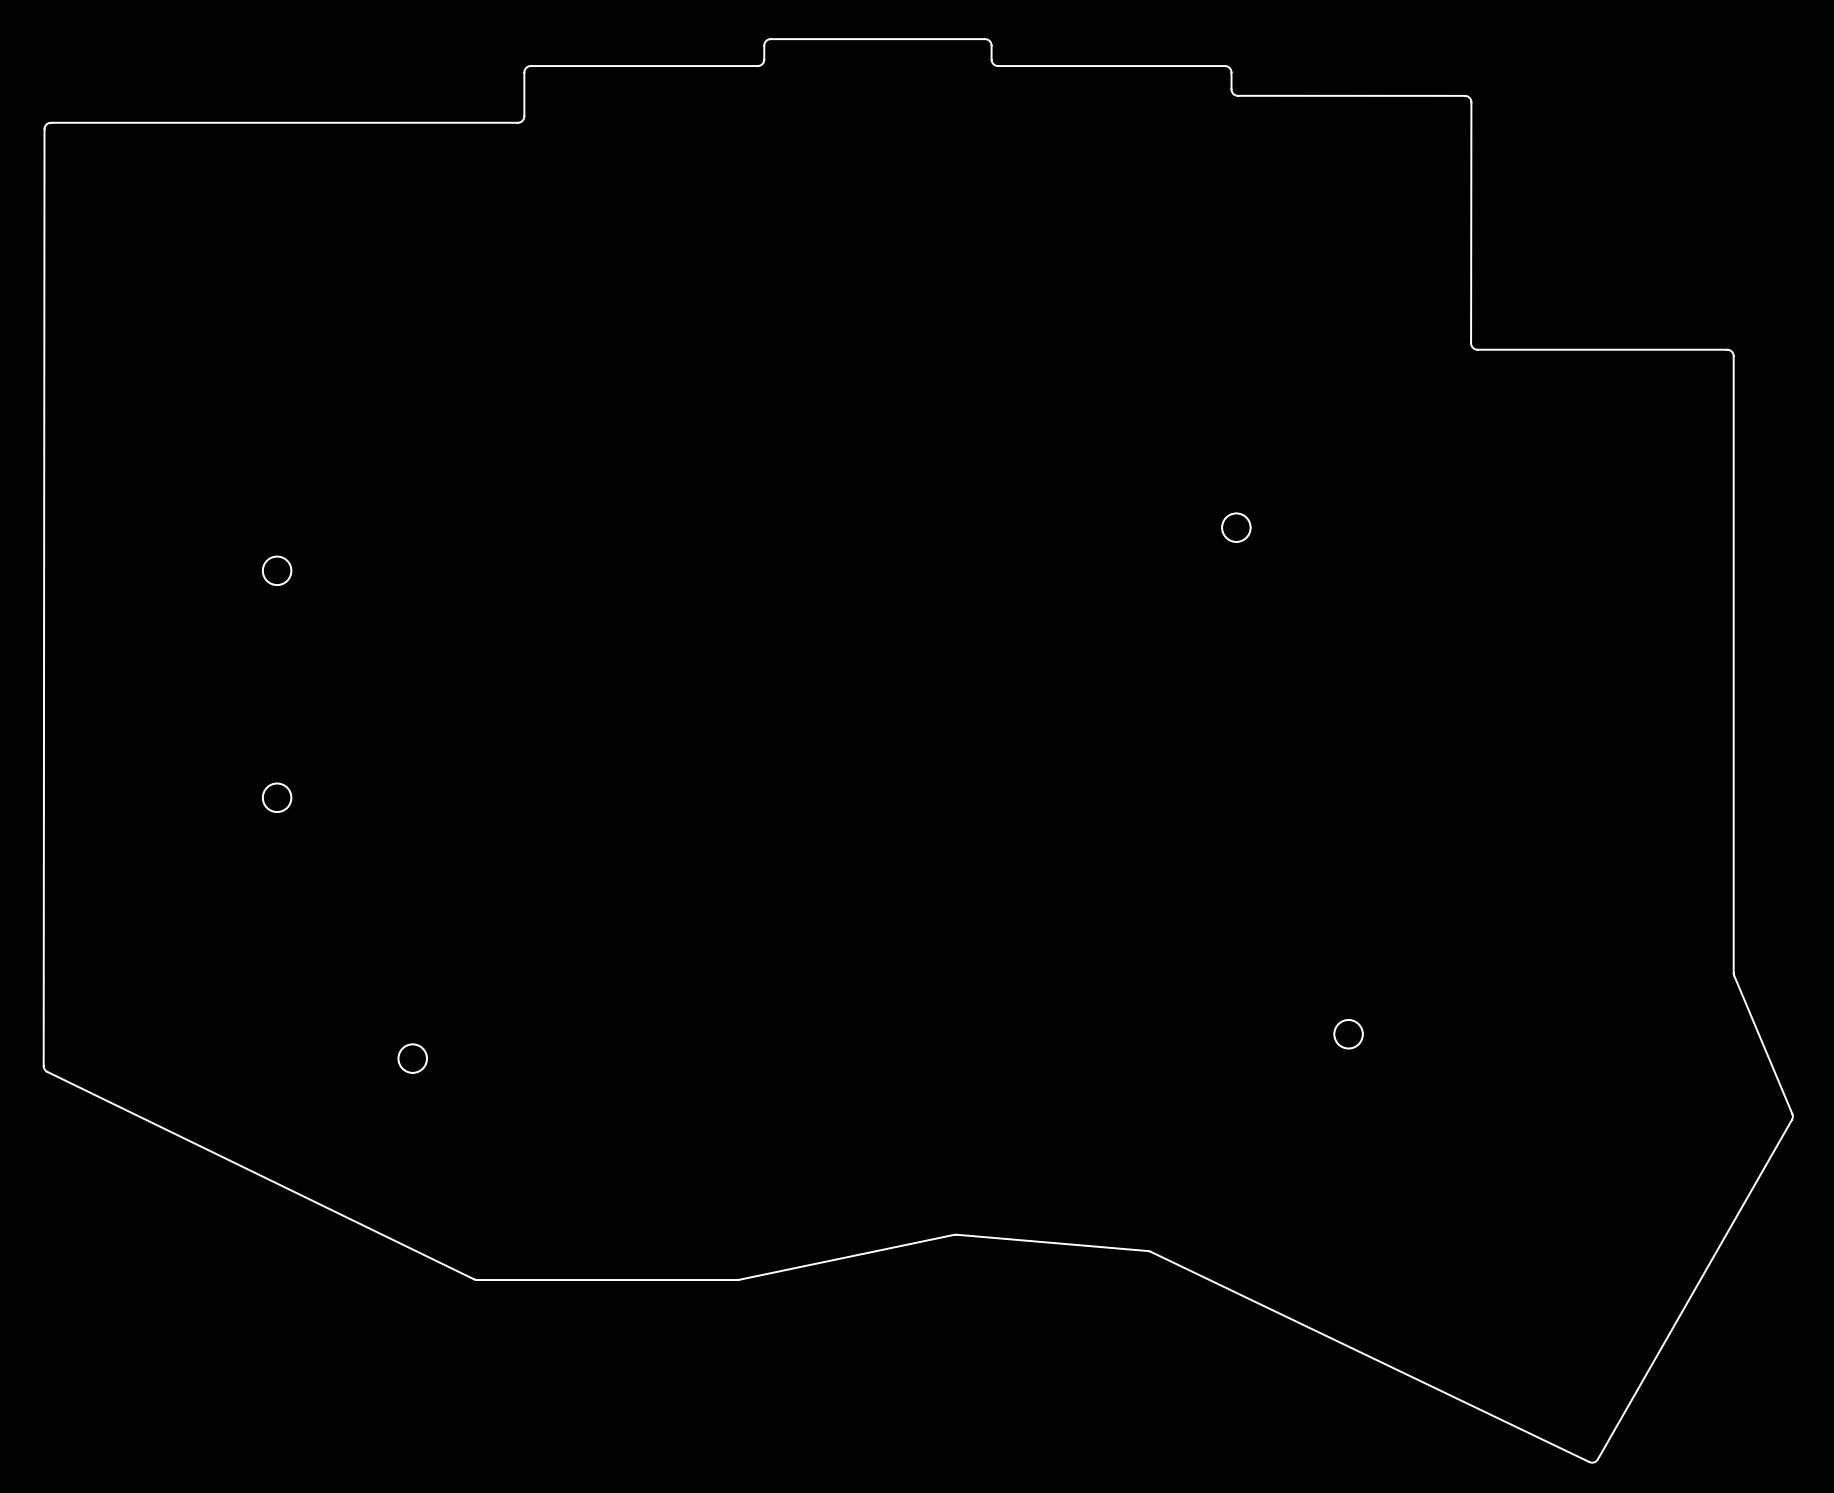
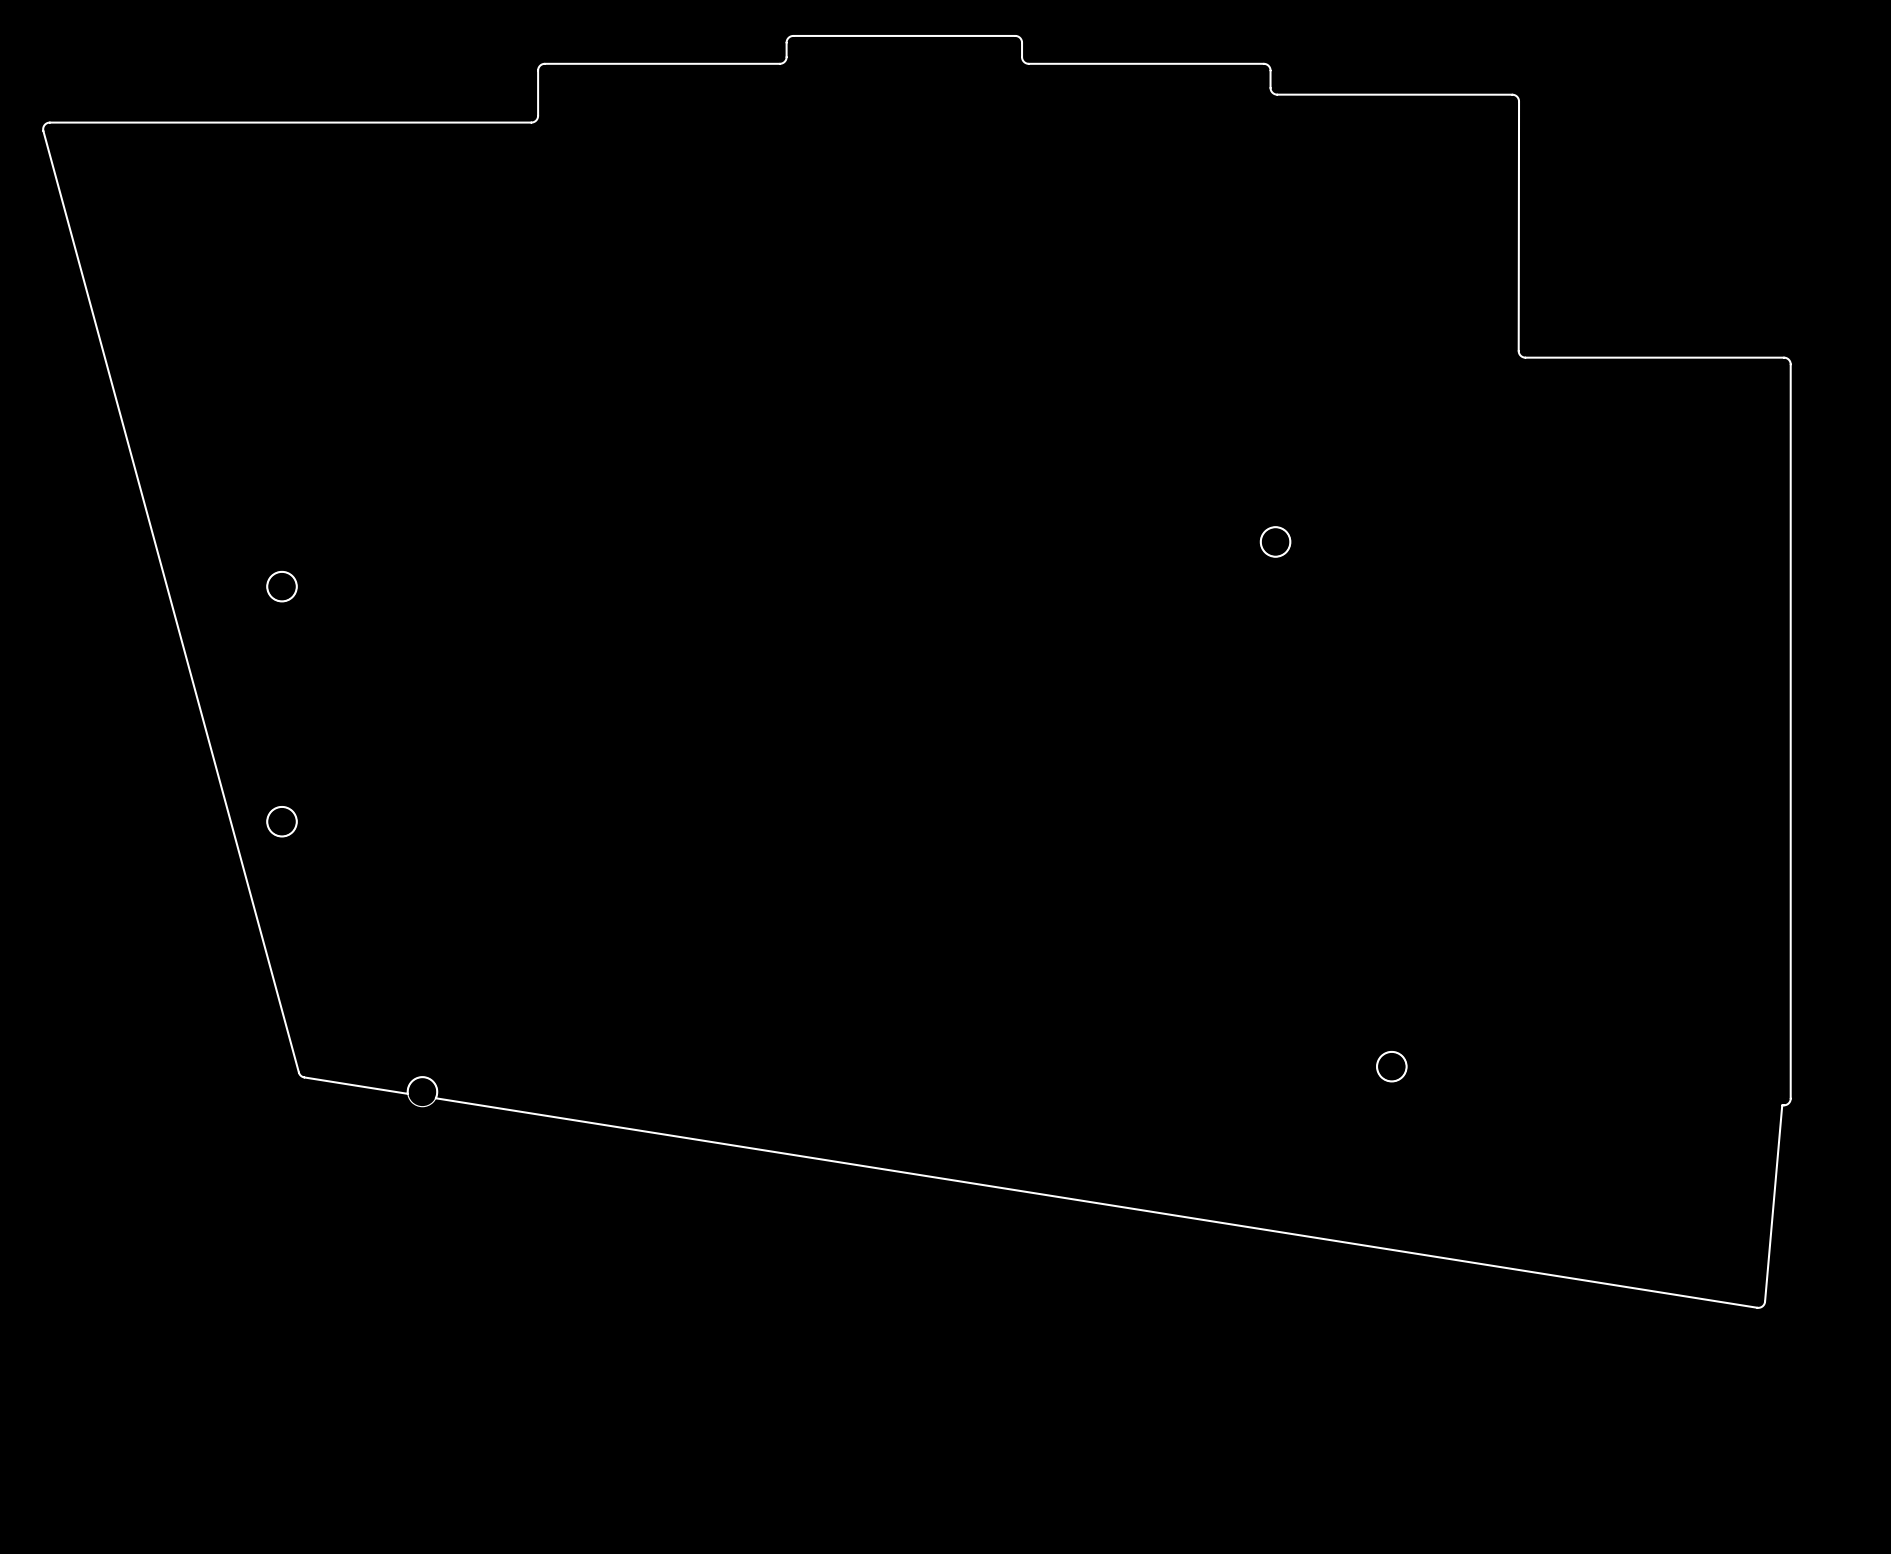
board edge: (53, 122) (47, 124) (44, 129) (43, 1066) (47, 1071) (475, 1279) (738, 1279) (955, 1234) (1148, 1251) (1592, 1462) (1597, 1459) (1792, 1118) (1733, 973) -> (49, 122) (44, 125) (43, 131) (298, 1072) (302, 1076) (407, 1093) (411, 1081) (417, 1077) (424, 1077) (435, 1084) (437, 1091) (435, 1098) (1758, 1307) (1763, 1305) (1765, 1301) (1782, 1105) (1787, 1104) (1790, 1099) (1790, 1003)
round board edge: [397, 1043, 428, 1074] -> none

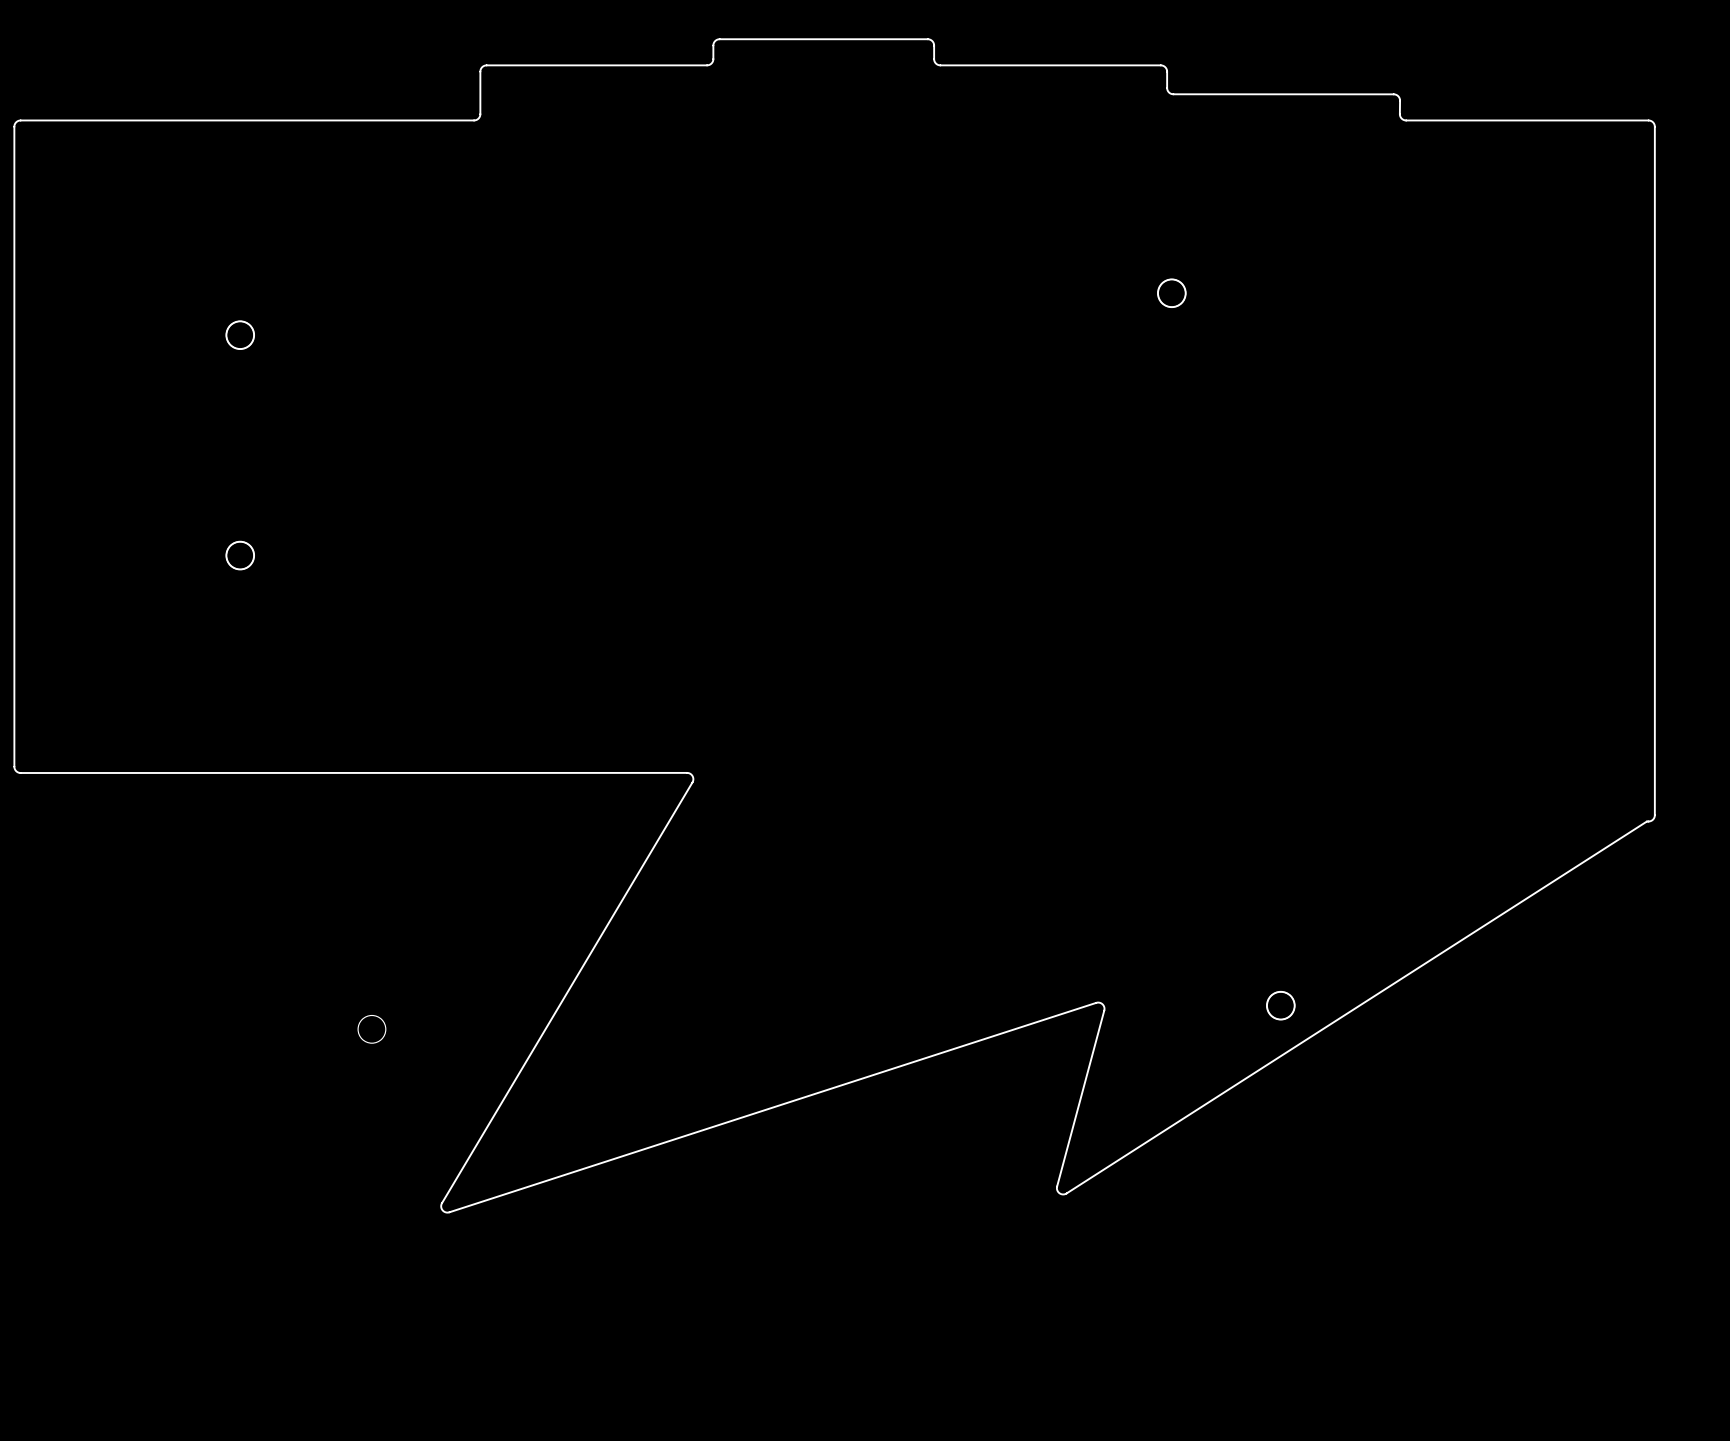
board edge: (1512, 94) (1517, 96) (1519, 101) (1518, 350) (1520, 355) (1525, 357) (1784, 357) (1788, 359) (1790, 364) -> (1393, 94) (1399, 97) (1400, 115) (1405, 120) (1648, 120) (1653, 122) (1654, 126) (1654, 347)
board edge: (49, 122) (44, 125) (43, 131) (298, 1072) (302, 1077) (407, 1093) (411, 1081) (417, 1077) (424, 1077) (435, 1084) (437, 1091) (435, 1098) (1759, 1307) (1765, 1301) (1782, 1105) (1787, 1104) (1790, 1099) (1790, 863) -> (22, 120) (16, 121) (14, 126) (14, 766) (16, 771) (20, 773) (687, 772) (692, 776) (692, 782) (442, 1203) (441, 1208) (444, 1212) (449, 1212) (1099, 1002) (1103, 1005) (1104, 1010) (1056, 1187) (1059, 1193) (1065, 1194) (1646, 821) (1651, 820) (1654, 815)
round board edge: none -> [225, 320, 256, 350]
round board edge position: (1275, 541) -> (1171, 293)
round board edge: [266, 805, 298, 838] -> none

